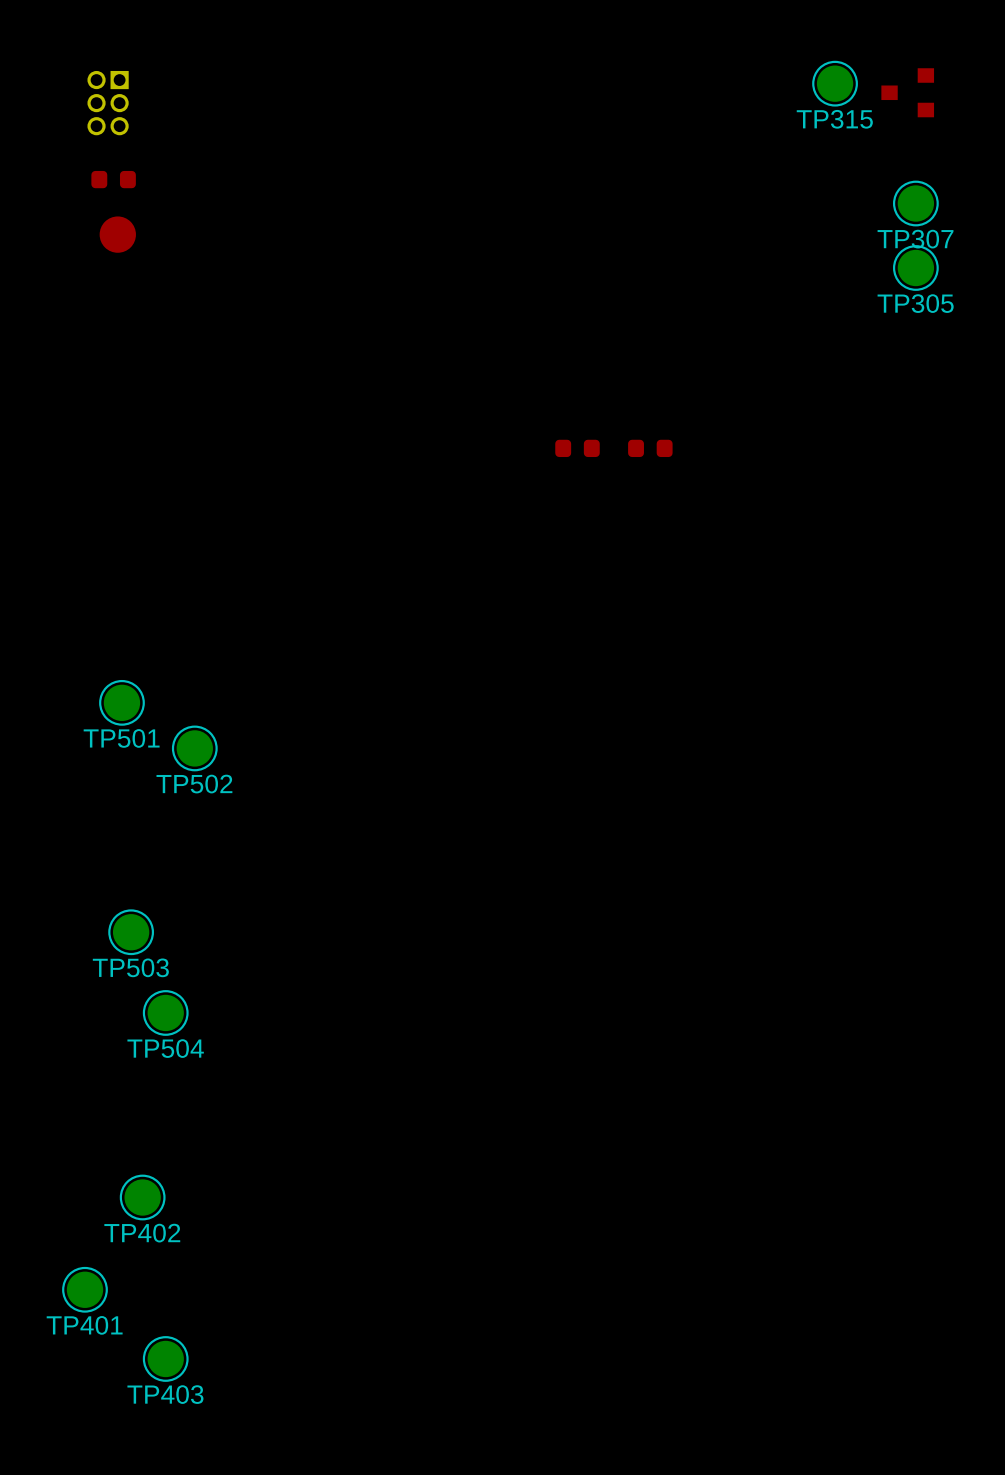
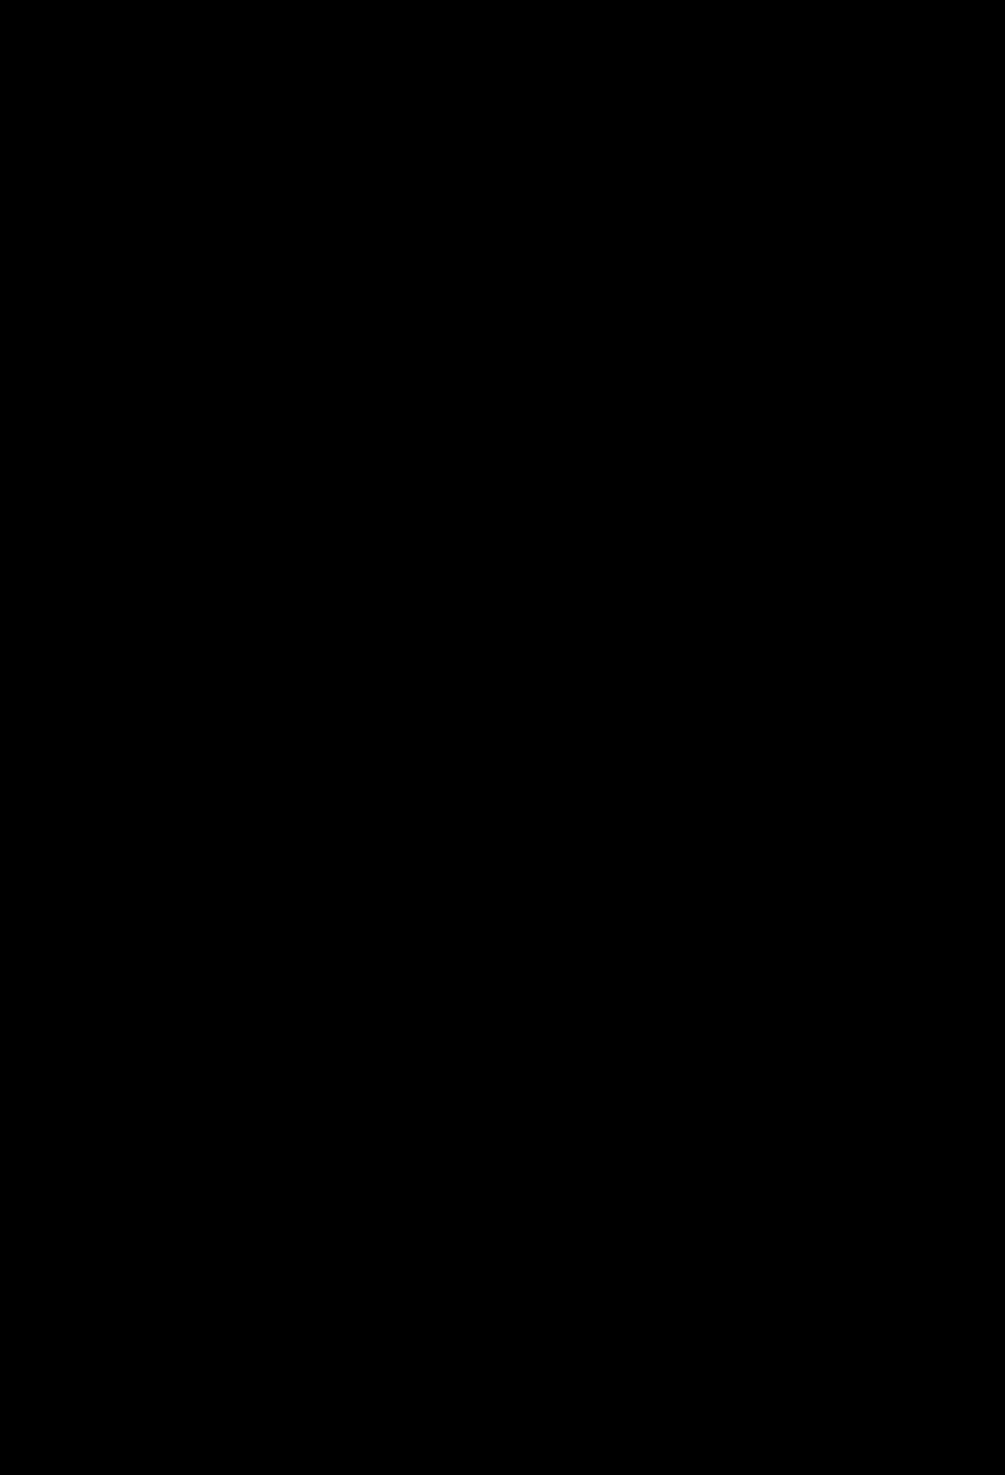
TP315: (835, 83) -> none
part: (907, 92) -> none
part: (108, 103) -> none
part: (113, 179) -> none
TP307: (915, 203) -> none
part: (117, 234) -> none
TP305: (915, 267) -> none
part: (577, 448) -> none
part: (650, 448) -> none
TP501: (121, 702) -> none
TP502: (194, 748) -> none
TP503: (131, 932) -> none
TP504: (165, 1012) -> none
TP402: (142, 1197) -> none
TP401: (84, 1289) -> none
TP403: (165, 1358) -> none

